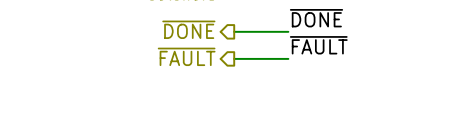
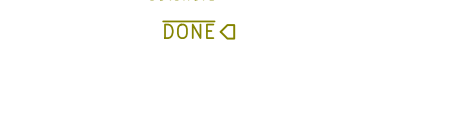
label: ~{DONE} (316, 18) -> none
wire: (234, 31) (288, 31) -> none
label: ~{FAULT} (318, 45) -> none
hierarchical label: ~{FAULT} (186, 56) -> none
wire: (234, 58) (288, 58) -> none

